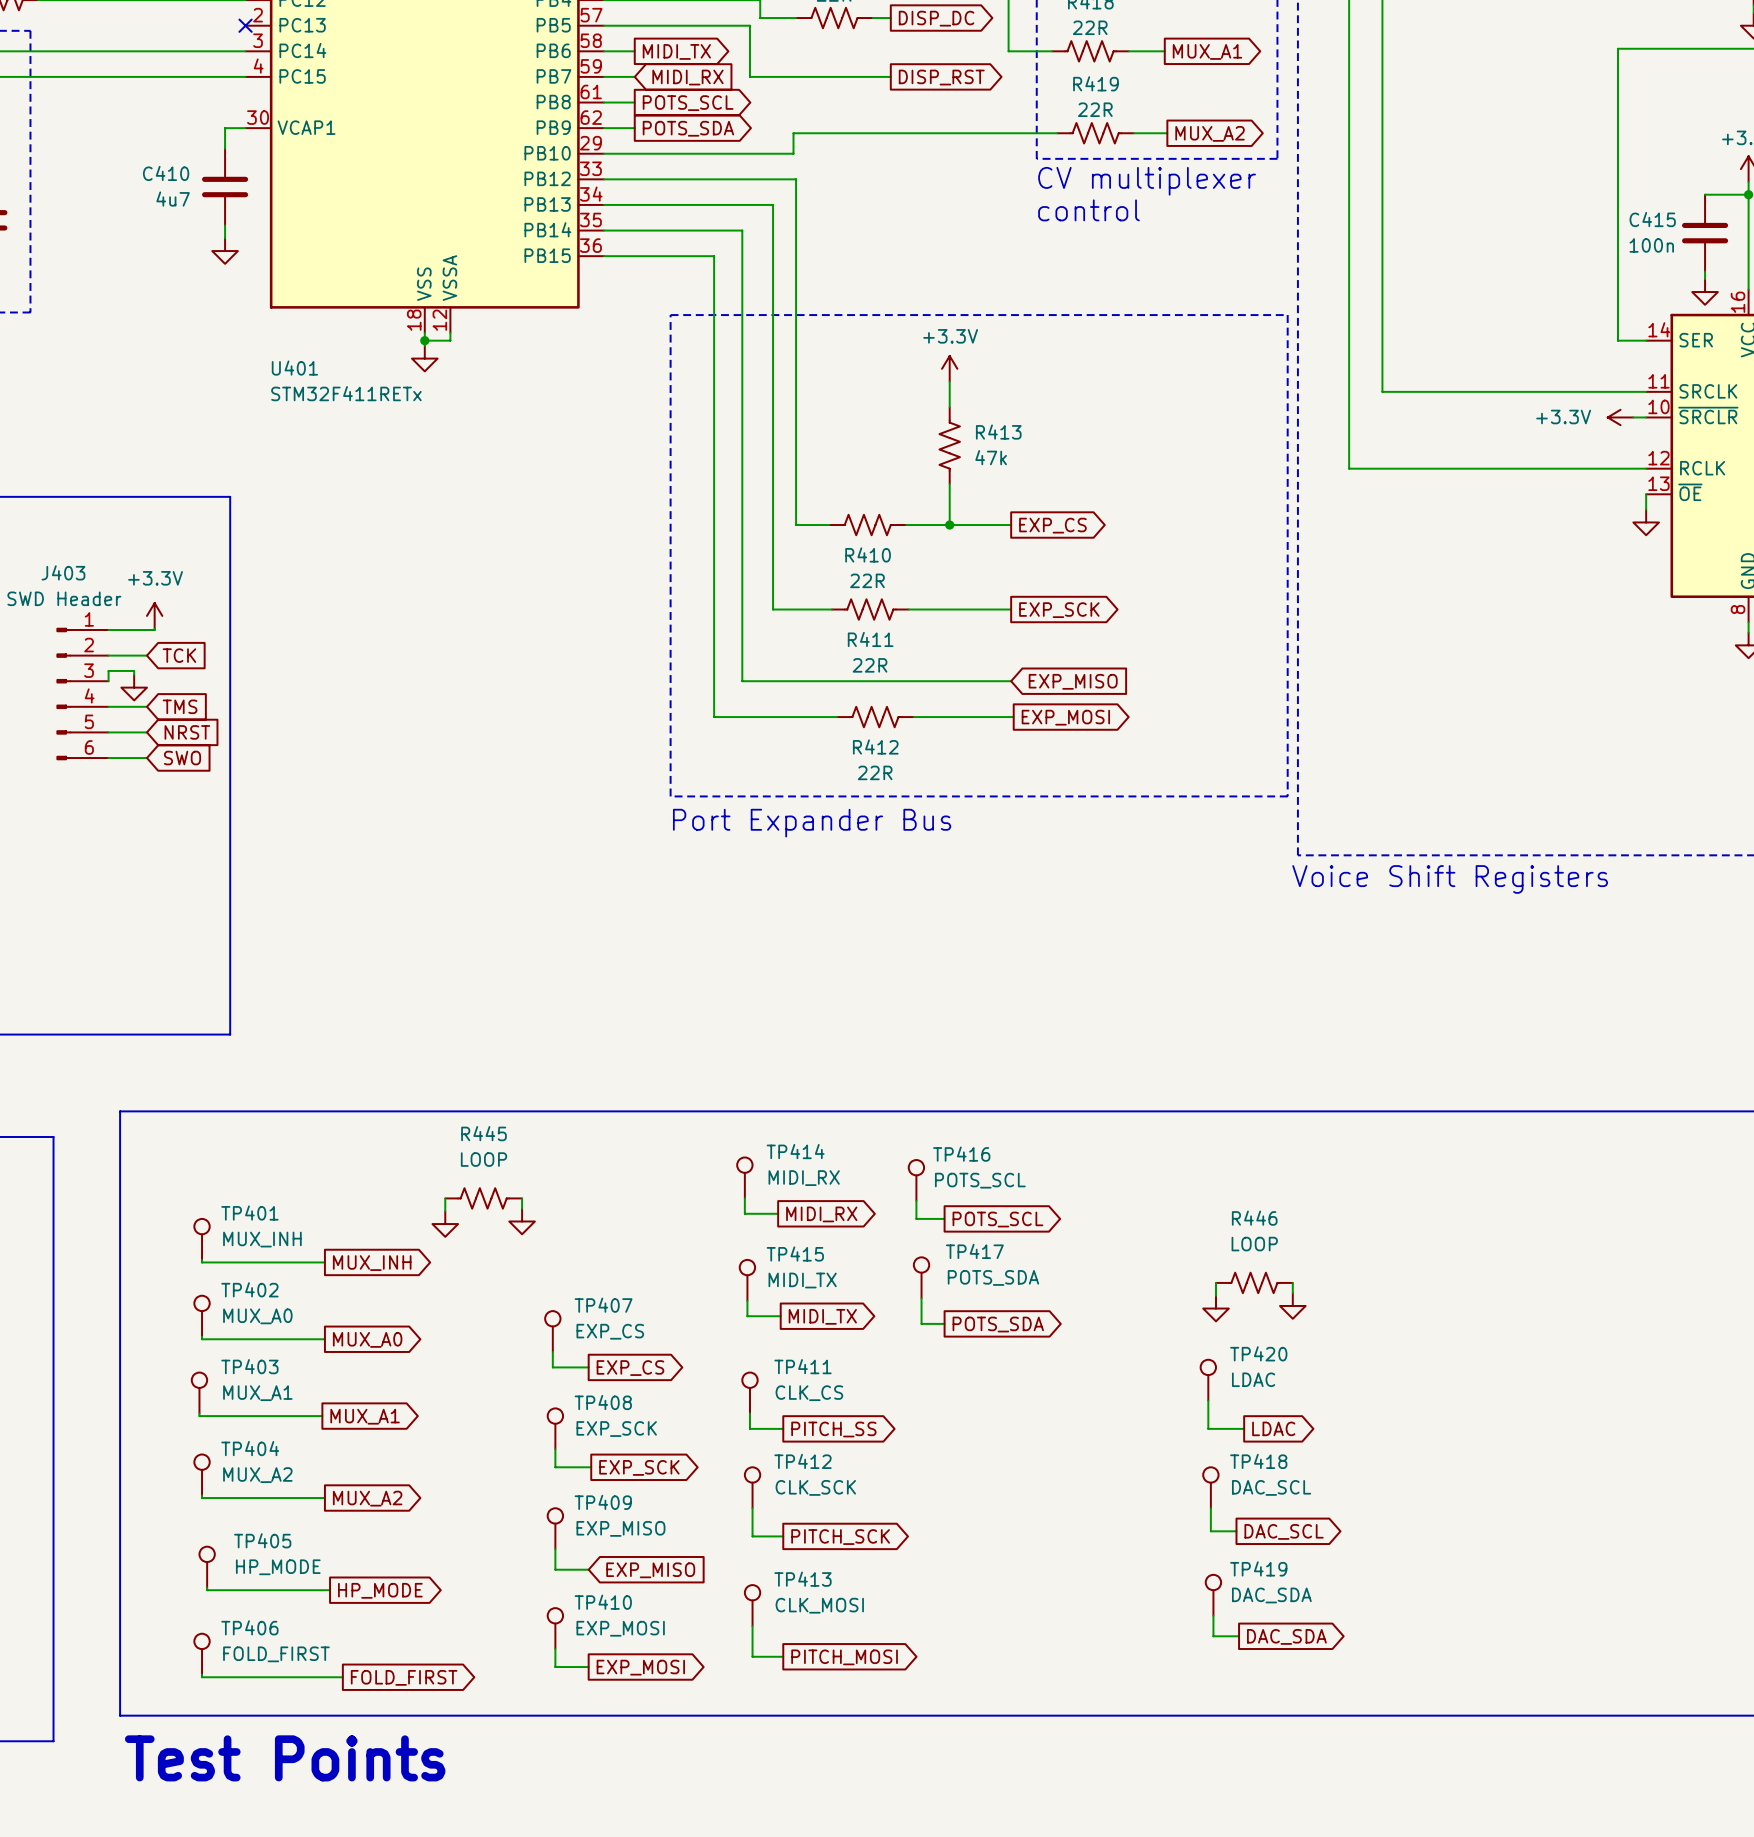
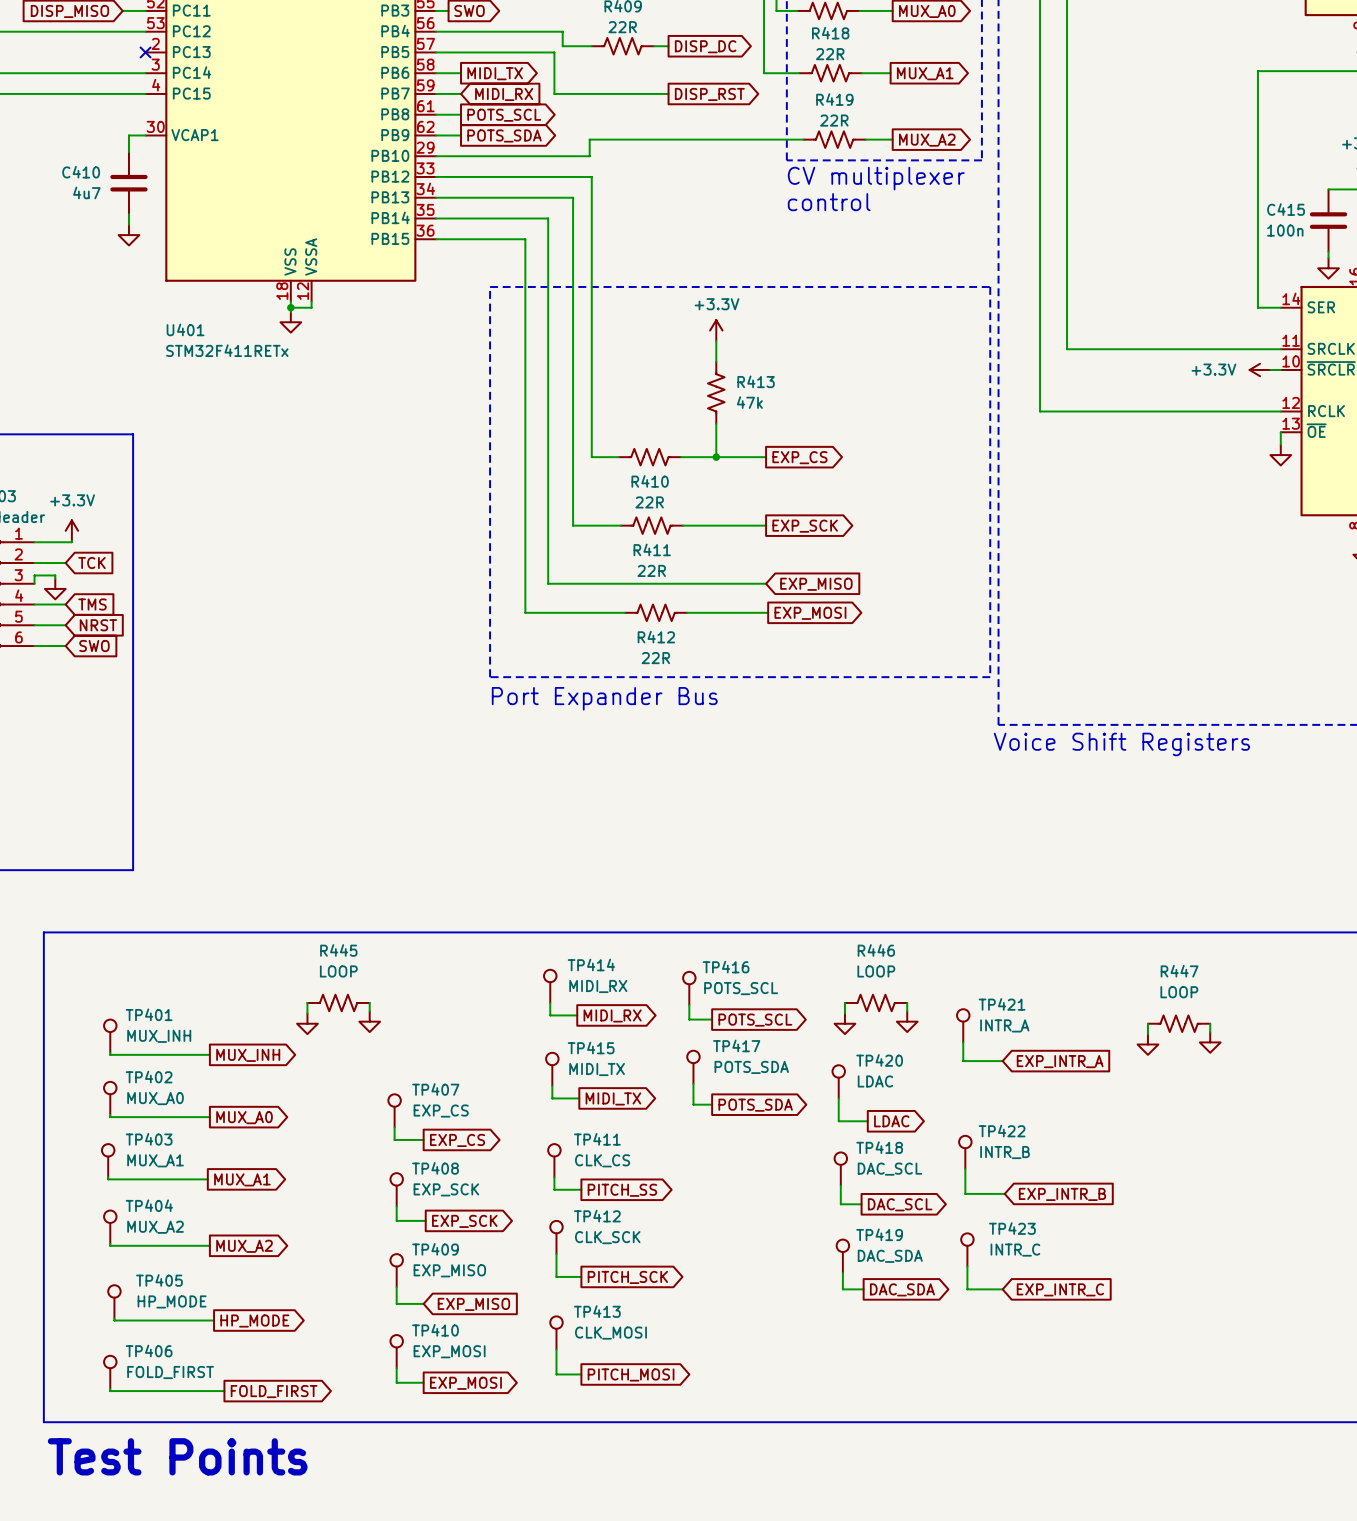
power symbol: none -> (907, 1021)
power symbol: none -> (844, 1023)
wire: none -> (1147, 1023) (1147, 1034)
R447: none -> LOOP (1179, 1023)
wire: none -> (1210, 1023) (1210, 1032)
TP421: none -> INTR_A (963, 1025)
wire: none -> (963, 1042) (963, 1061) (1002, 1061)
power symbol: none -> (1210, 1042)
power symbol: none -> (1147, 1044)
global label: none -> EXP_INTR_A (1060, 1061)
wire: (1216, 1282) (1216, 1295) -> (844, 1002) (844, 1013)
R446 position: (1254, 1282) -> (876, 1002)
wire: (1292, 1282) (1292, 1293) -> (907, 1002) (907, 1011)
power symbol: (1292, 1305) -> none
power symbol: (1216, 1308) -> none
TP420 position: (1208, 1380) -> (838, 1081)
TP422: none -> INTR_B (965, 1152)
wire: (1208, 1400) (1208, 1428) (1244, 1428) -> (838, 1098) (838, 1121) (867, 1121)
wire: none -> (965, 1169) (965, 1193) (1004, 1193)
global label position: LDAC (1273, 1428) -> LDAC (891, 1121)
global label: none -> EXP_INTR_B (1062, 1194)
TP418 position: (1210, 1487) -> (840, 1169)
TP423: none -> INTR_C (967, 1249)
wire: (1210, 1508) (1210, 1531) (1236, 1531) -> (840, 1185) (840, 1204) (861, 1204)
wire: none -> (967, 1266) (967, 1289) (1002, 1289)
global label position: DAC_SCL (1284, 1531) -> DAC_SCL (900, 1204)
global label: none -> EXP_INTR_C (1060, 1289)
TP419 position: (1213, 1595) -> (842, 1256)
wire: (1213, 1615) (1213, 1636) (1239, 1636) -> (842, 1272) (842, 1289) (863, 1289)
global label position: DAC_SDA (1286, 1636) -> DAC_SDA (902, 1289)

